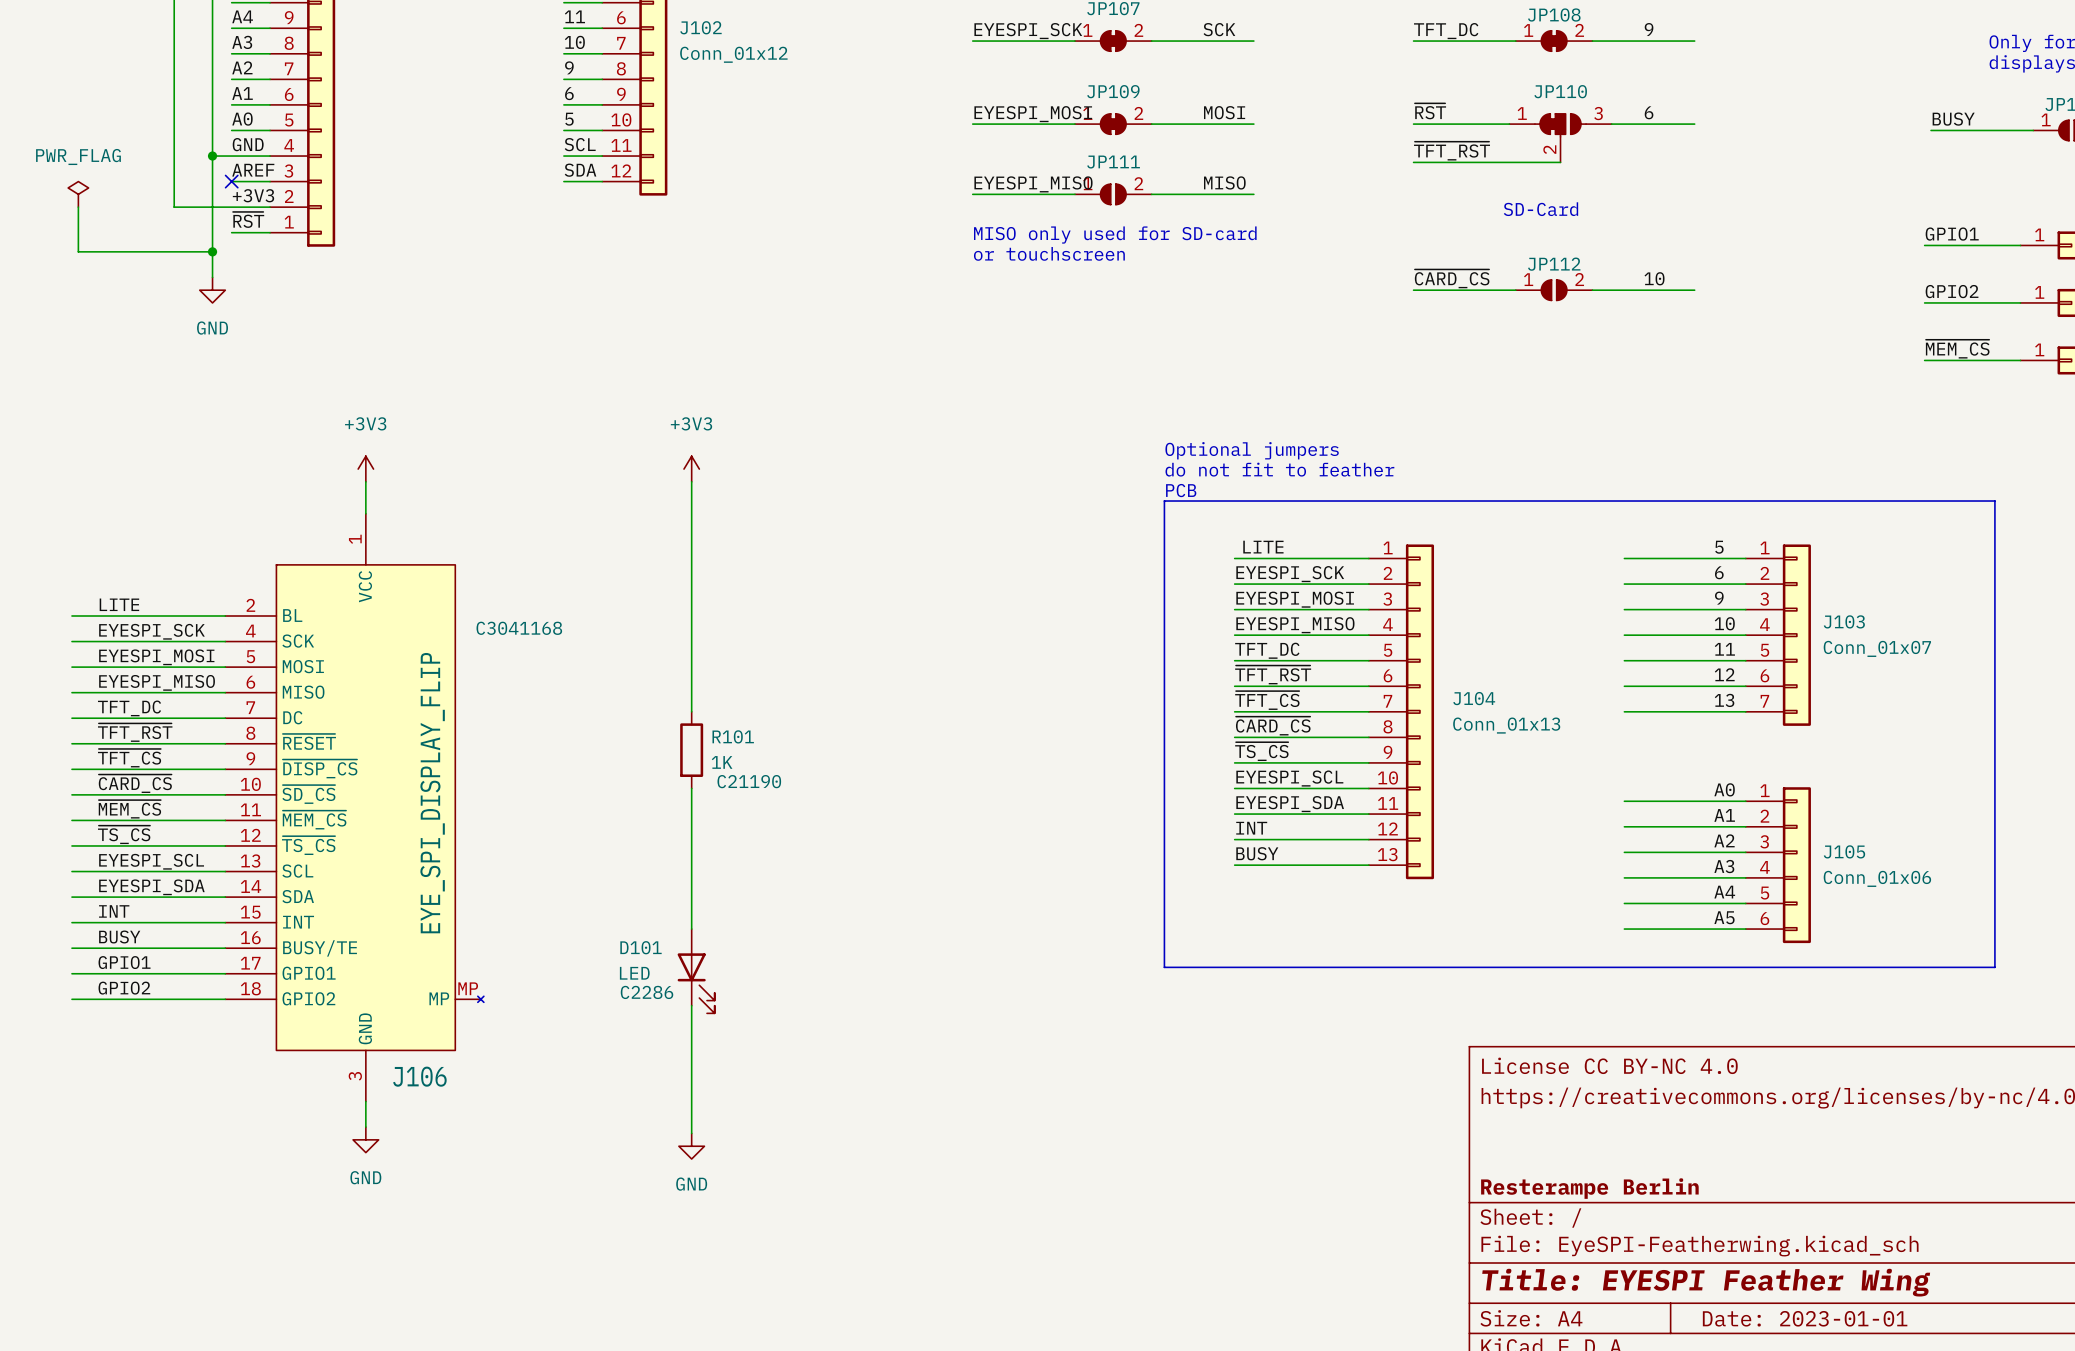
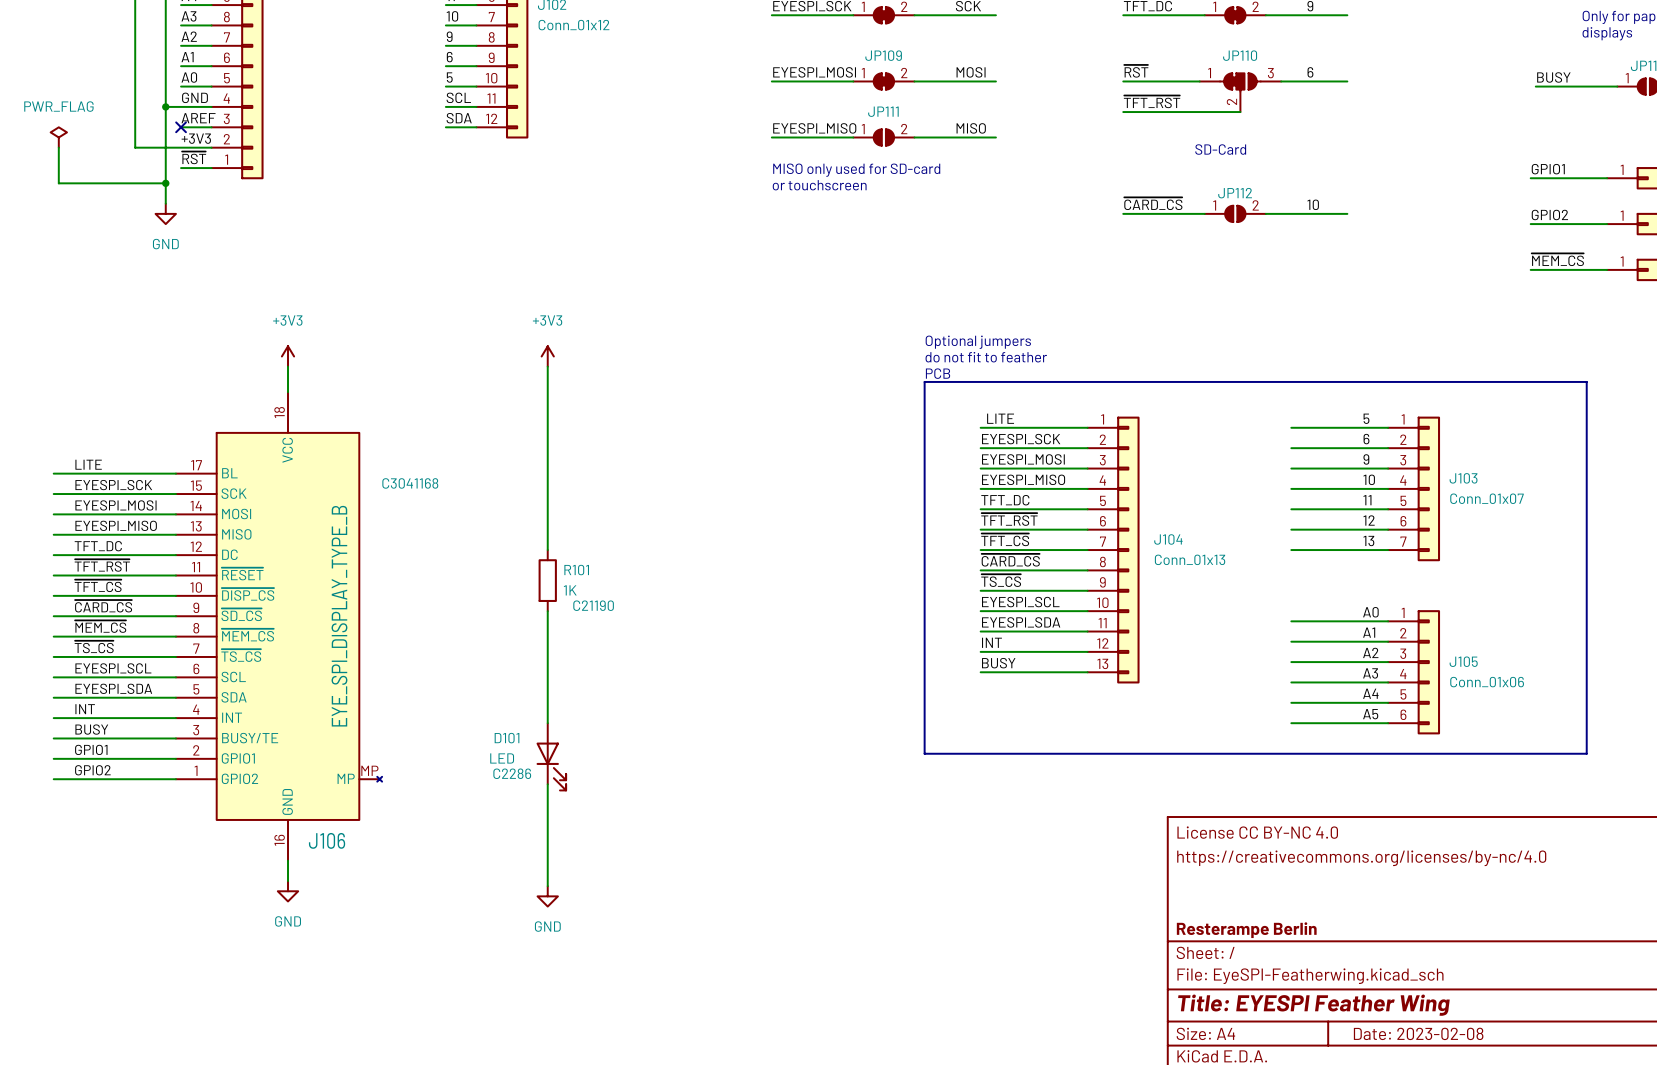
J106 symbol: [225, 513, 484, 1102] -> [175, 392, 383, 861]
J106 value: EYE_SPI_DISPLAY_FLIP (432, 793) -> EYE_SPI_DISPLAY_TYPE_B (339, 616)
title block: Date: 2023-01-01 (1805, 1318) -> Date: 2023-02-08 (1418, 1033)

